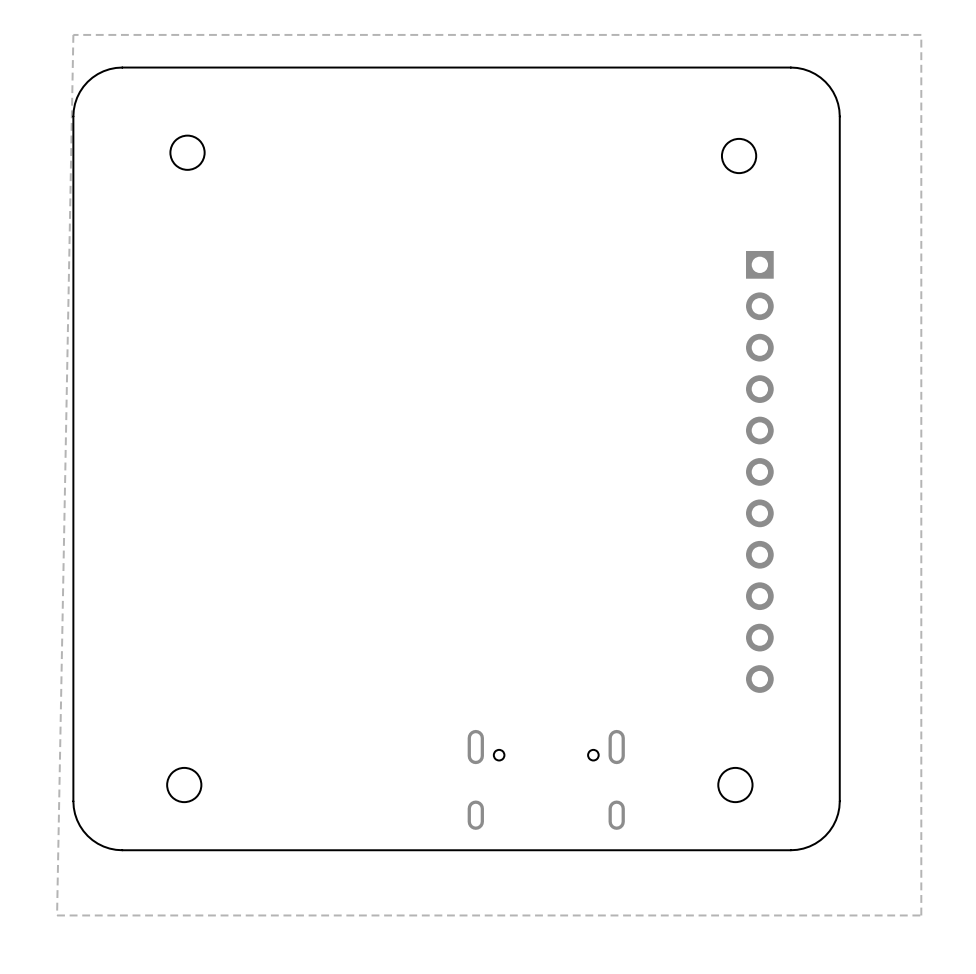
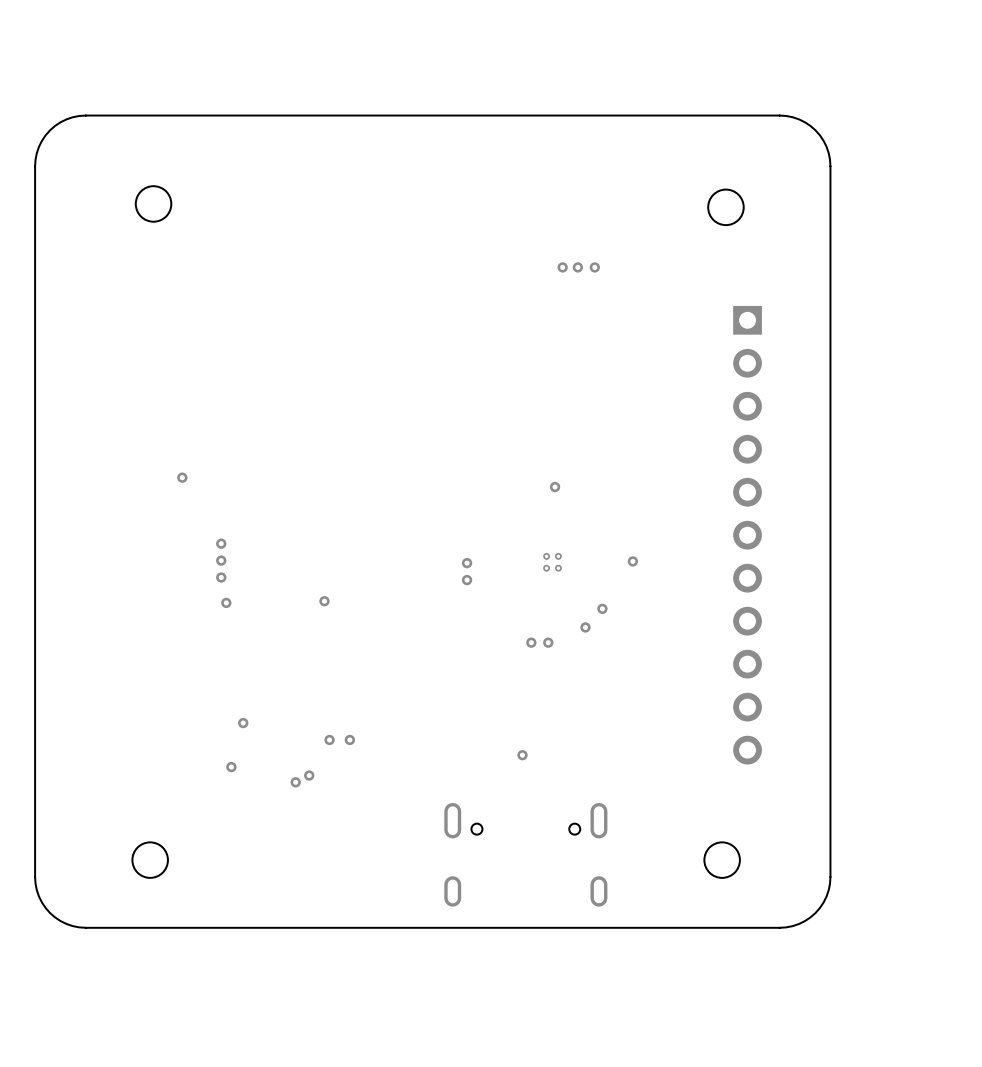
zone outline: (921, 34) (73, 34) (57, 915) (921, 915) (921, 34) -> none
via: none -> (562, 267)
via: none -> (577, 267)
via: none -> (594, 267)
via: none -> (182, 477)
via: none -> (555, 486)
via: none -> (221, 543)
via: none -> (546, 556)
via: none -> (558, 556)
via: none -> (221, 560)
via: none -> (632, 561)
via: none -> (467, 563)
via: none -> (546, 568)
via: none -> (558, 568)
via: none -> (221, 577)
via: none -> (467, 580)
via: none -> (324, 601)
via: none -> (226, 602)
via: none -> (602, 608)
via: none -> (585, 627)
via: none -> (531, 642)
via: none -> (548, 642)
via: none -> (243, 723)
via: none -> (329, 739)
via: none -> (349, 739)
via: none -> (522, 755)
via: none -> (231, 767)
via: none -> (309, 775)
via: none -> (295, 782)

